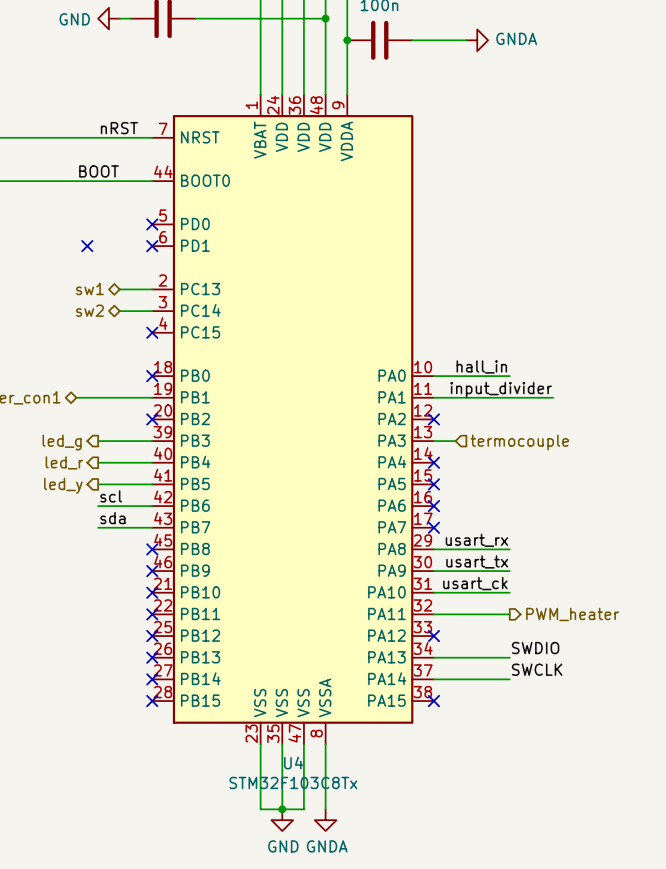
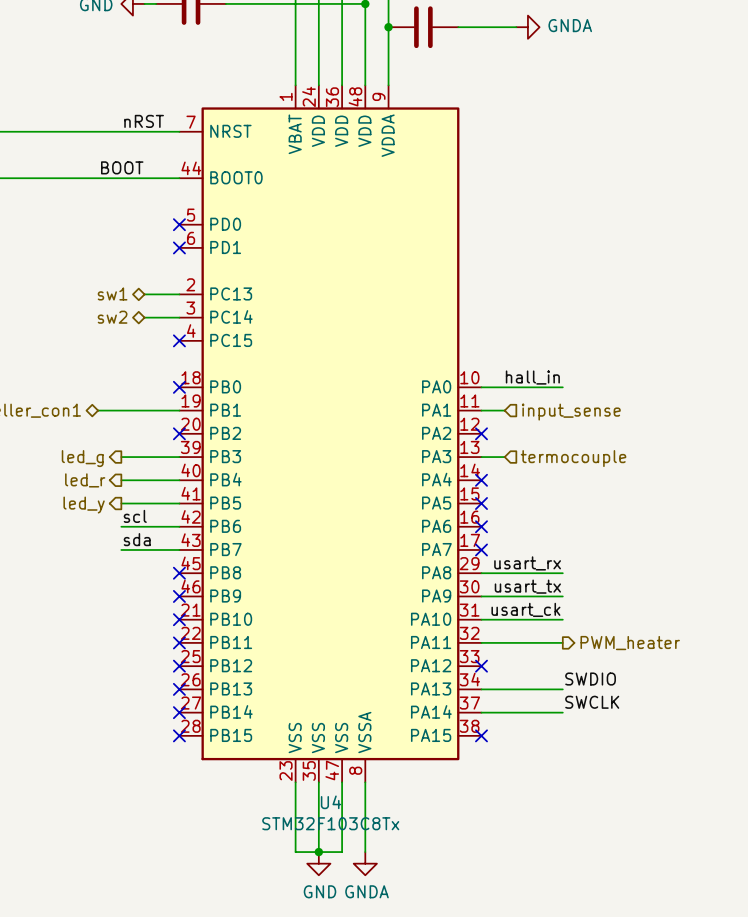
no-connect mark: (87, 246) -> none
label: input_divider (501, 389) -> none
wire: (455, 397) (553, 397) -> none
hierarchical label: none -> input_sense (571, 412)

